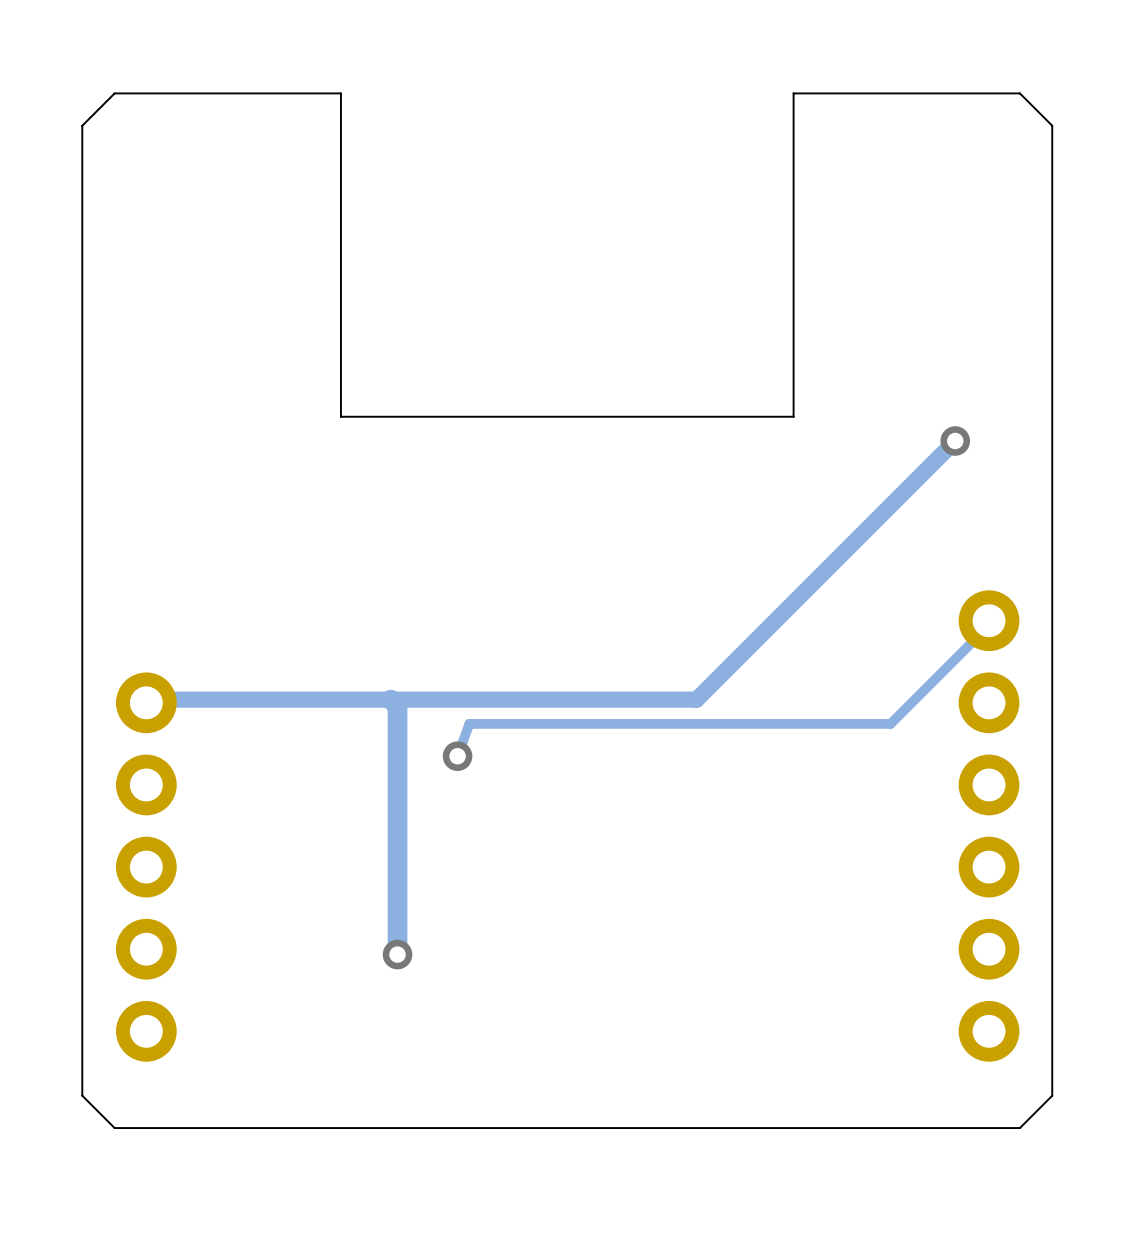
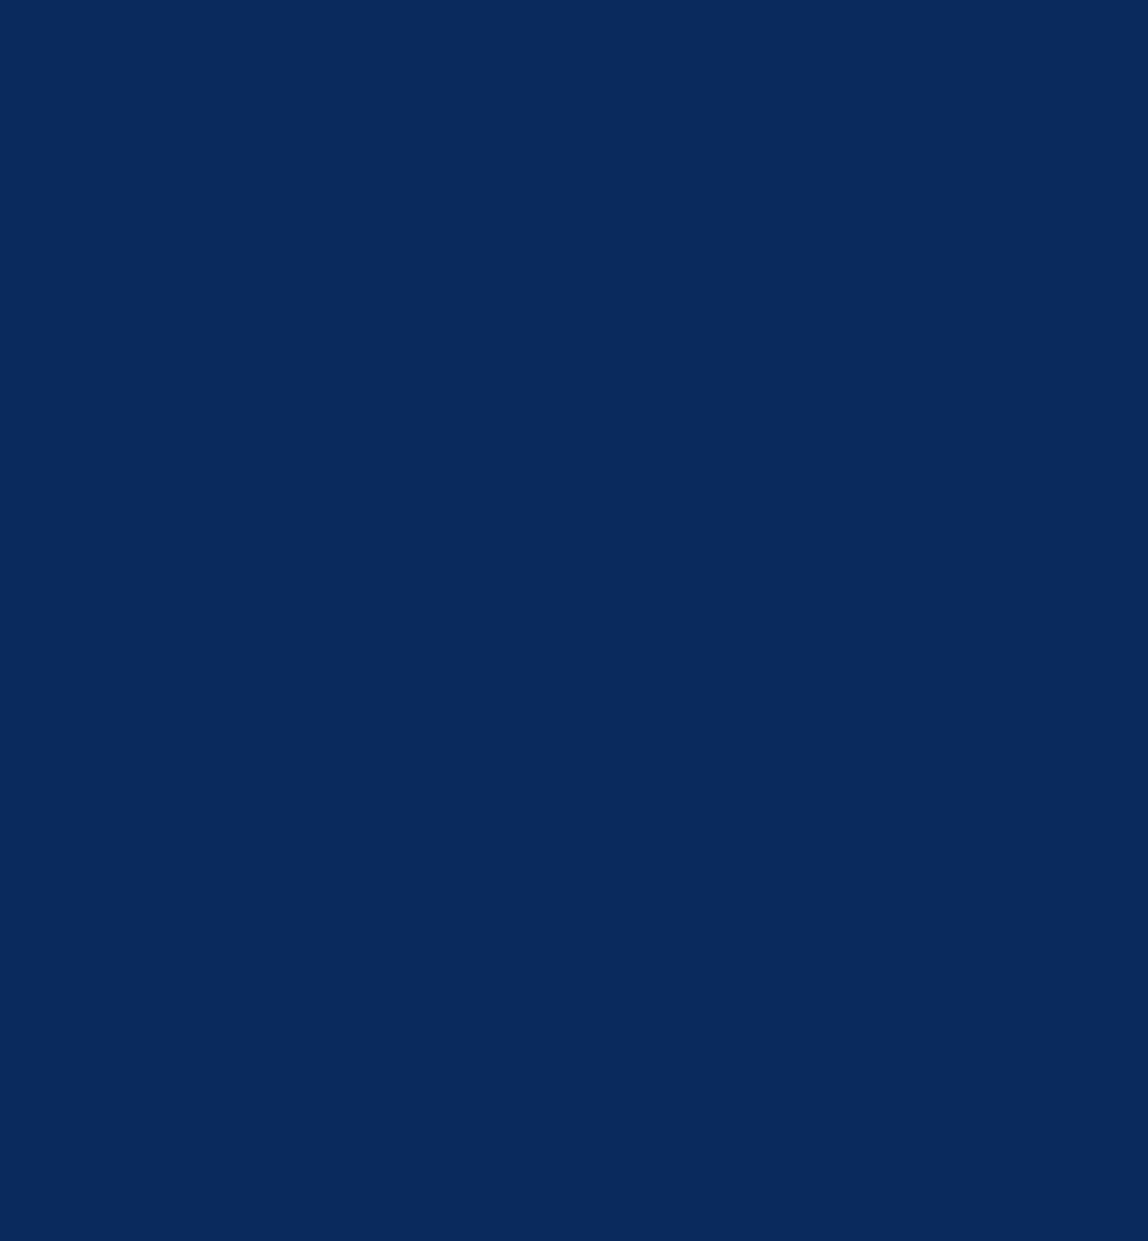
board edge: (1019, 93) (793, 93) (793, 416) (340, 416) (340, 93) (114, 93) (82, 125) (82, 1095) (114, 1128) (1019, 1128) (1052, 1095) (1052, 125) (1019, 93) -> none
track: (955, 440) (696, 699) (146, 699) (146, 702) -> none
via: (955, 440) -> none
track: (989, 620) (987, 626) (890, 723) (469, 723) (457, 756) -> none
track: (390, 699) (397, 706) (397, 954) -> none
via: (457, 756) -> none
part: (989, 826) -> none
part: (146, 867) -> none
via: (397, 954) -> none

